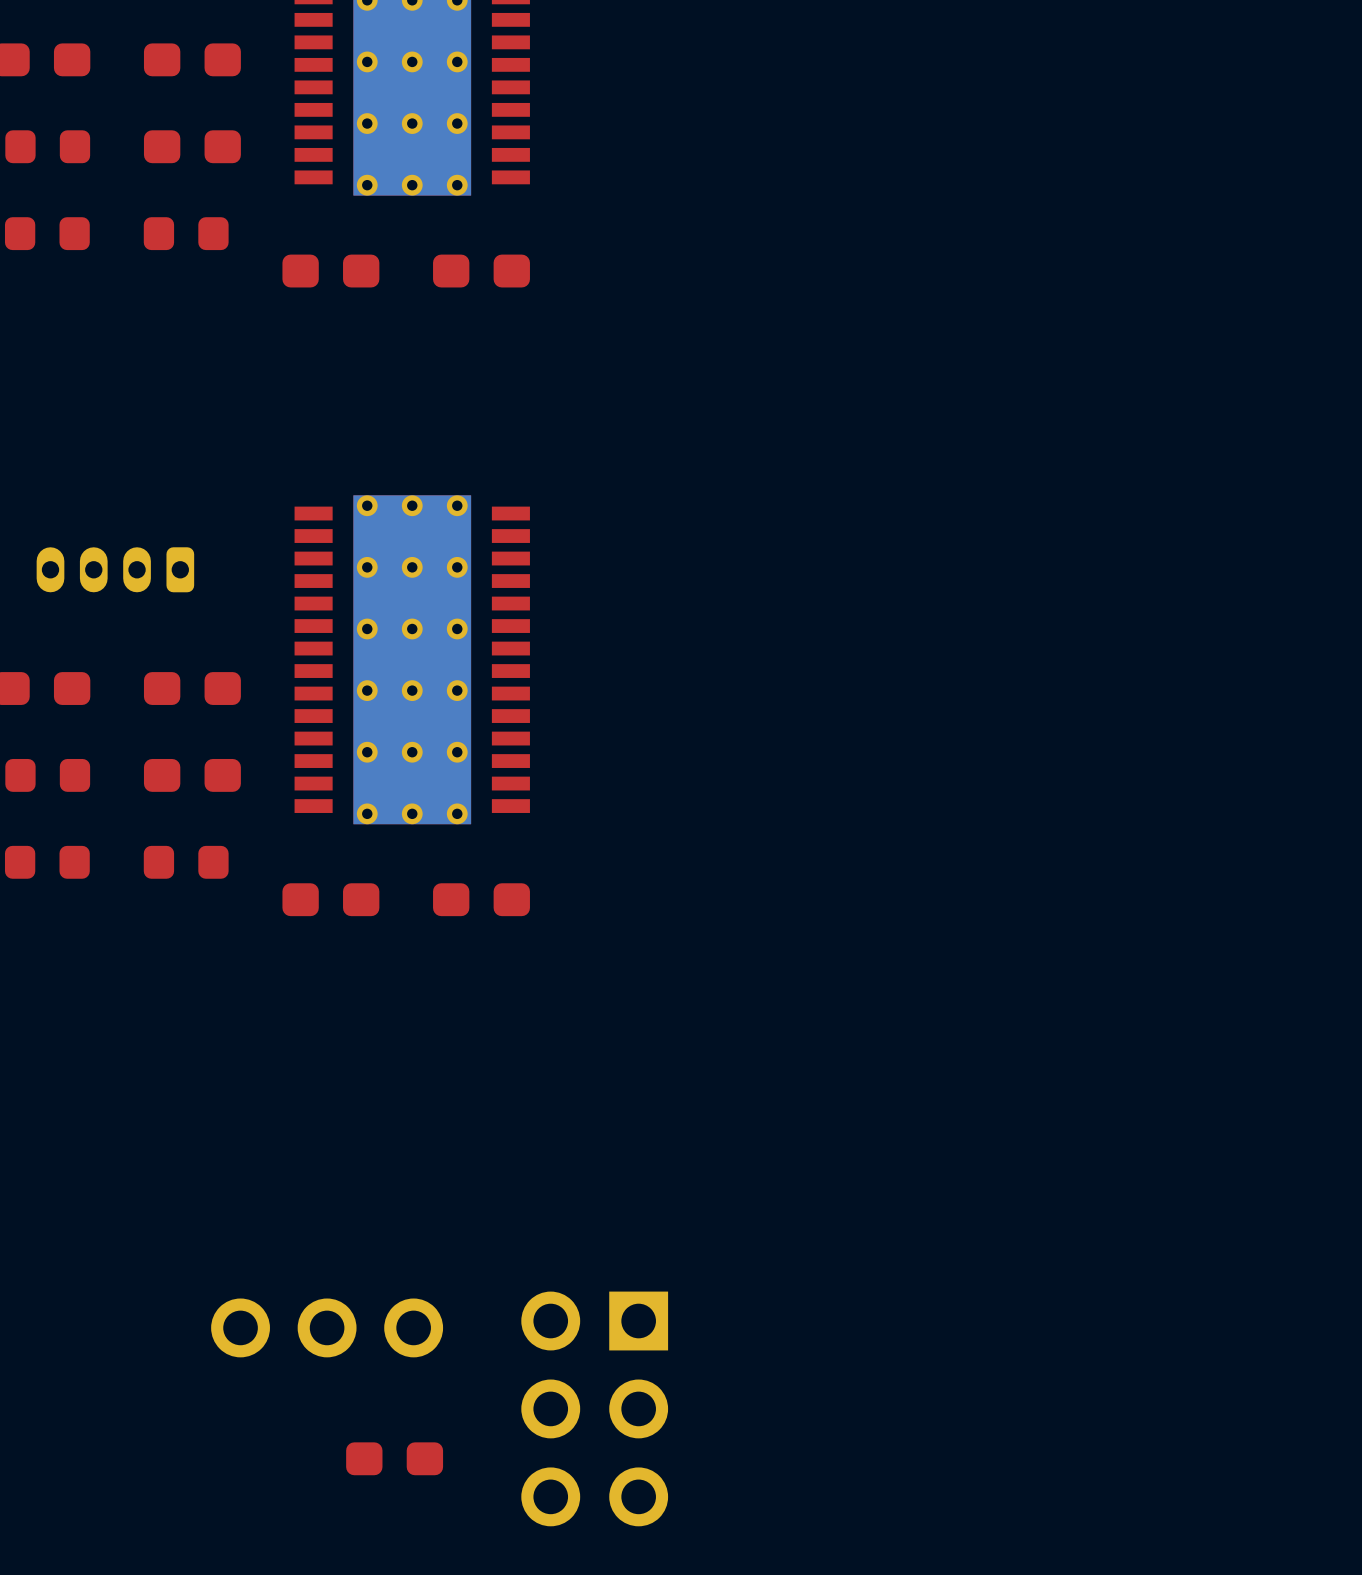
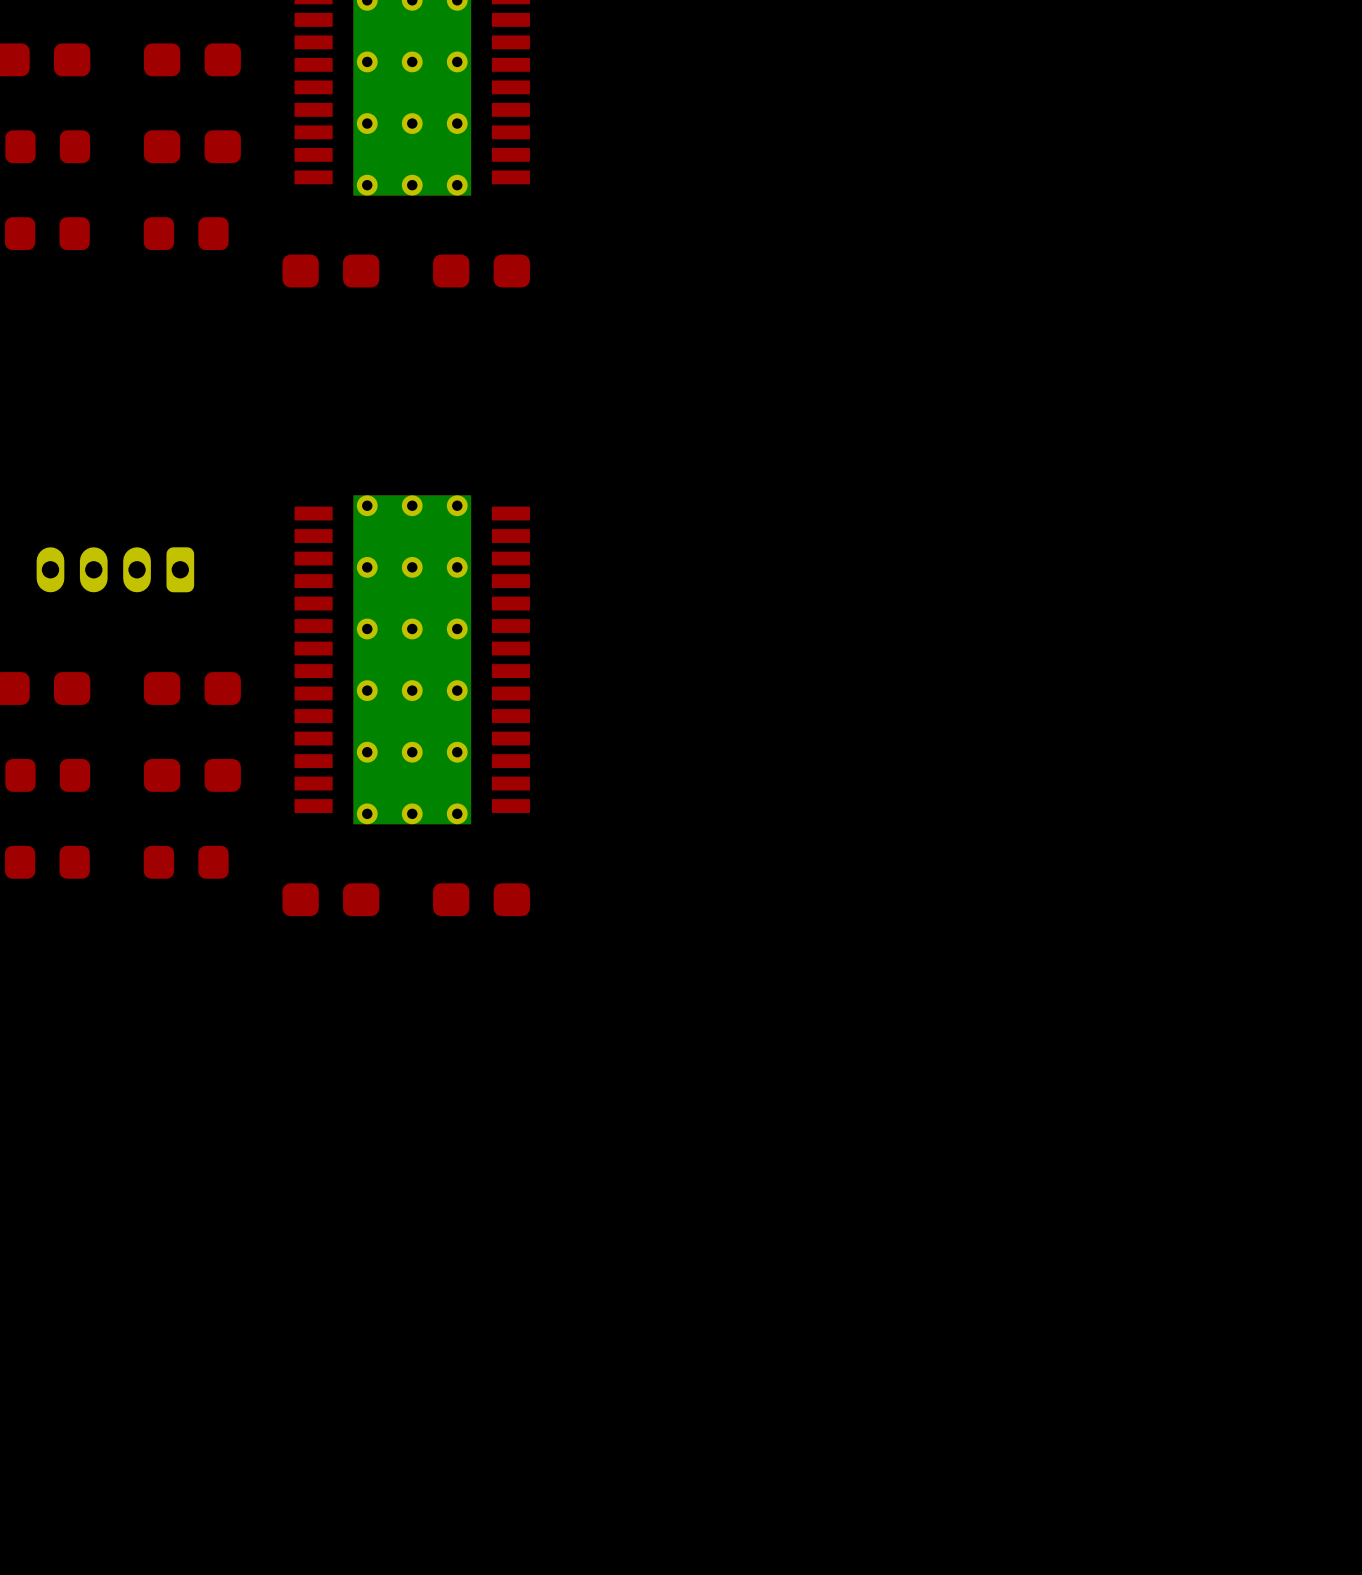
part: (327, 1327) -> none
part: (594, 1408) -> none
part: (394, 1458) -> none

